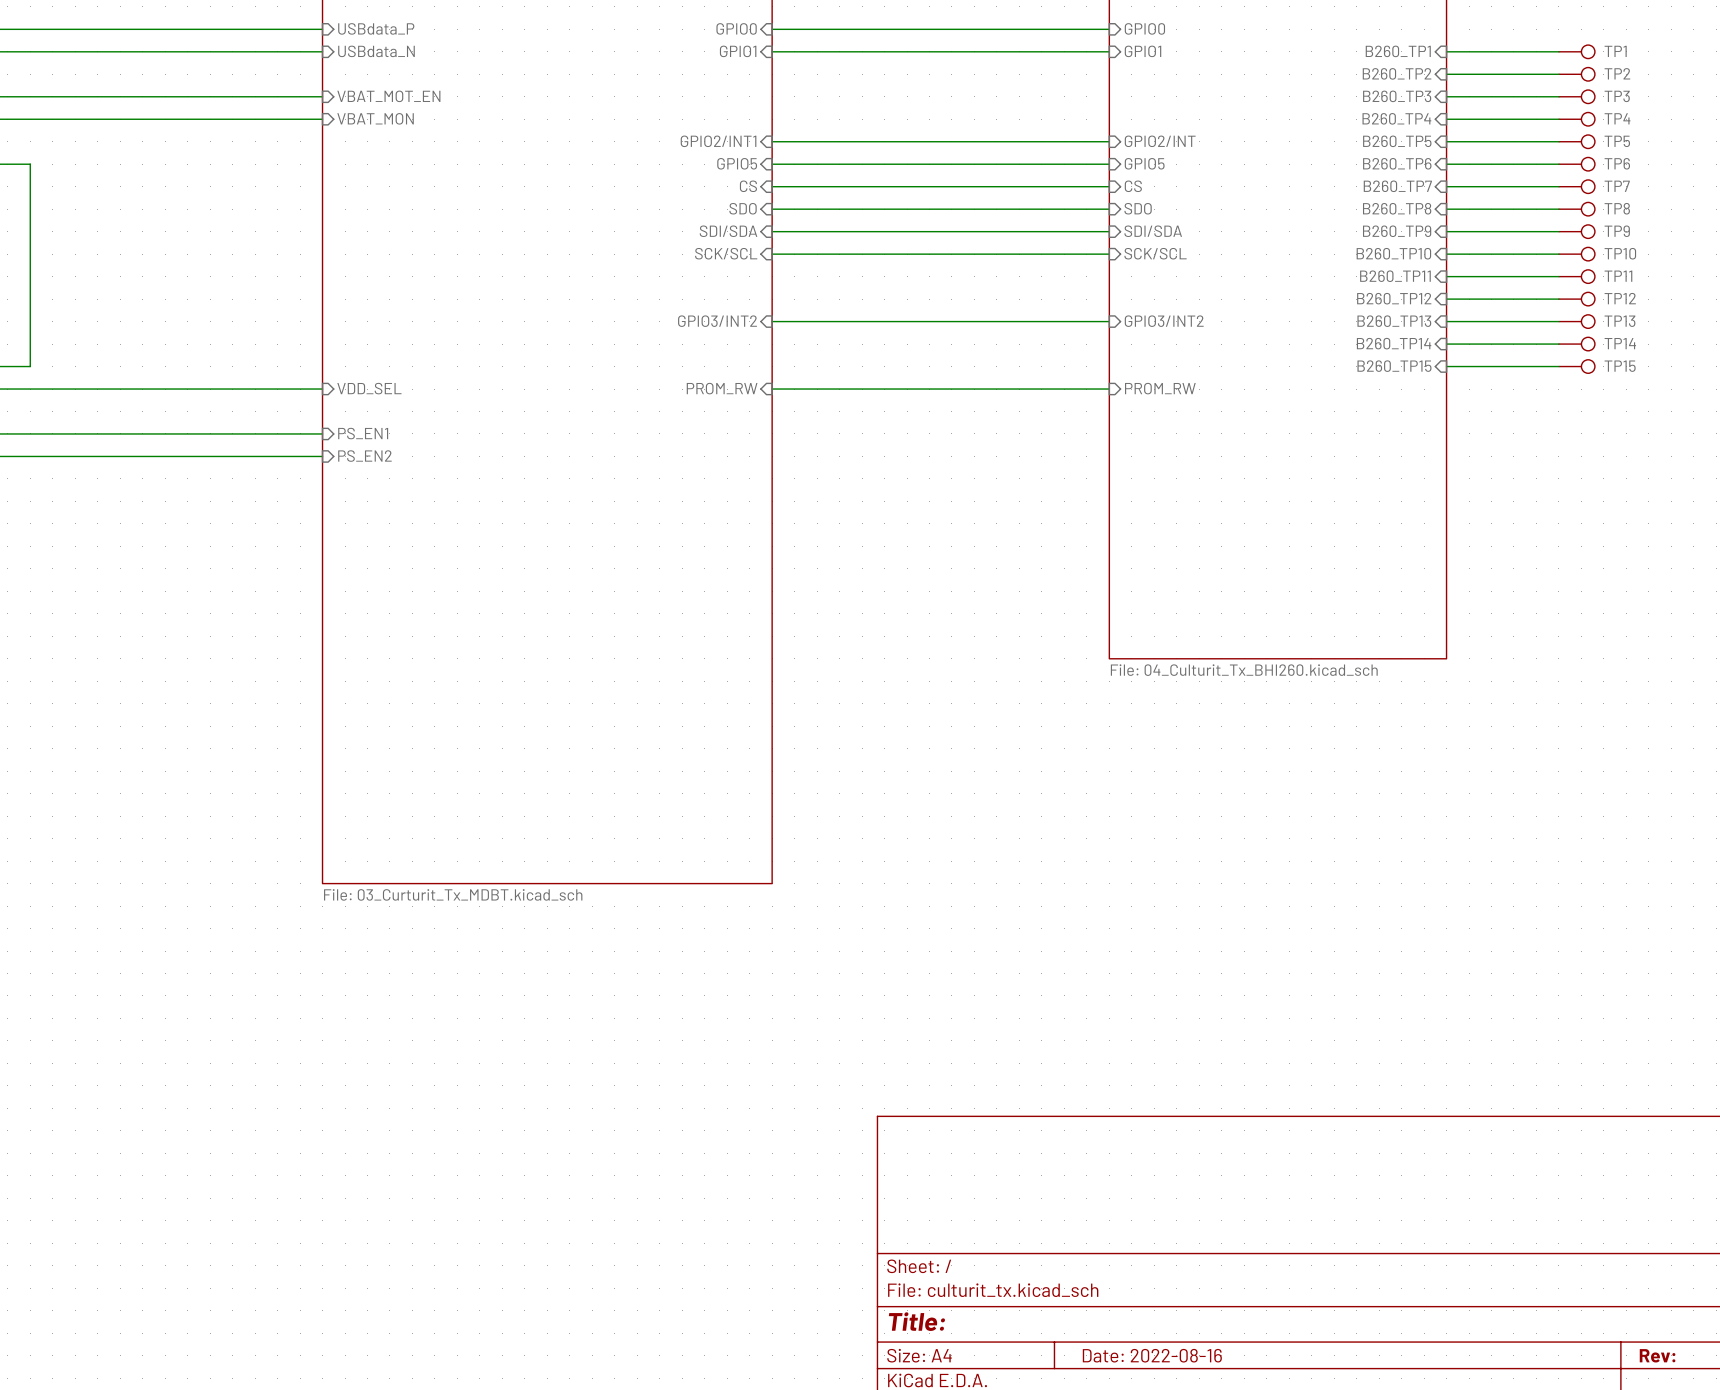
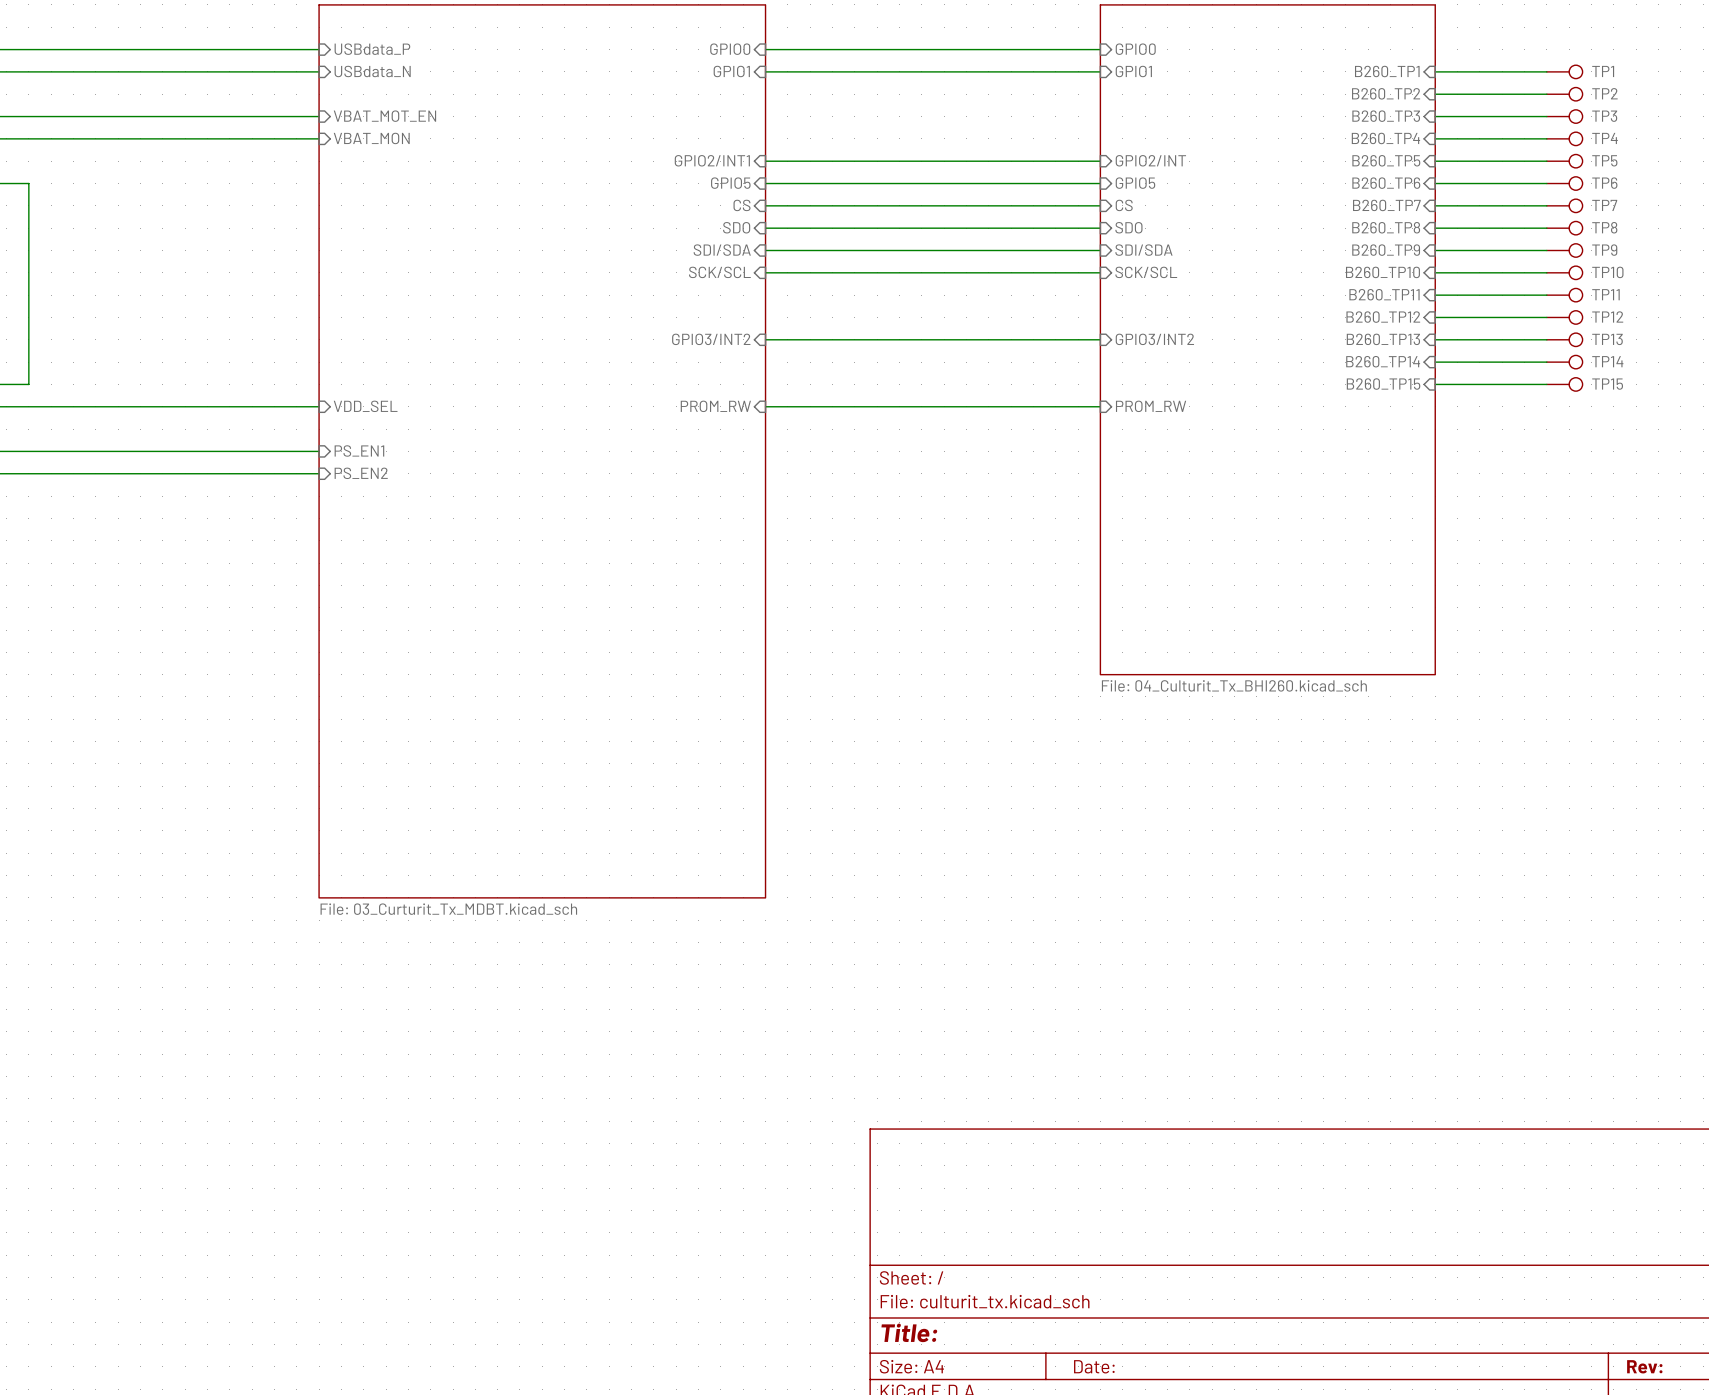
title block: Date: 2022-08-16 (1152, 1355) -> Date: (1094, 1366)

